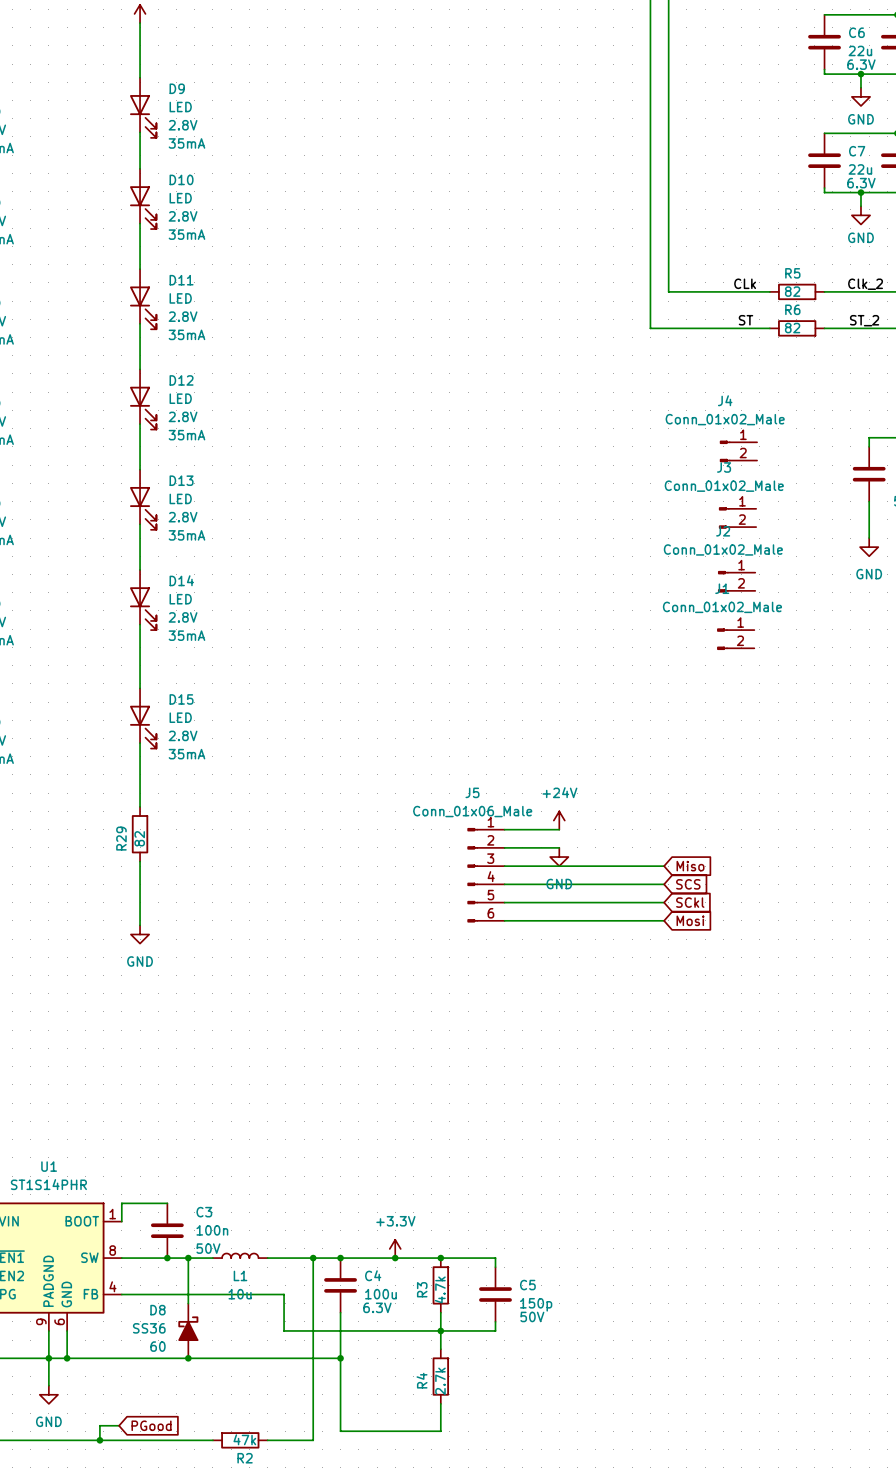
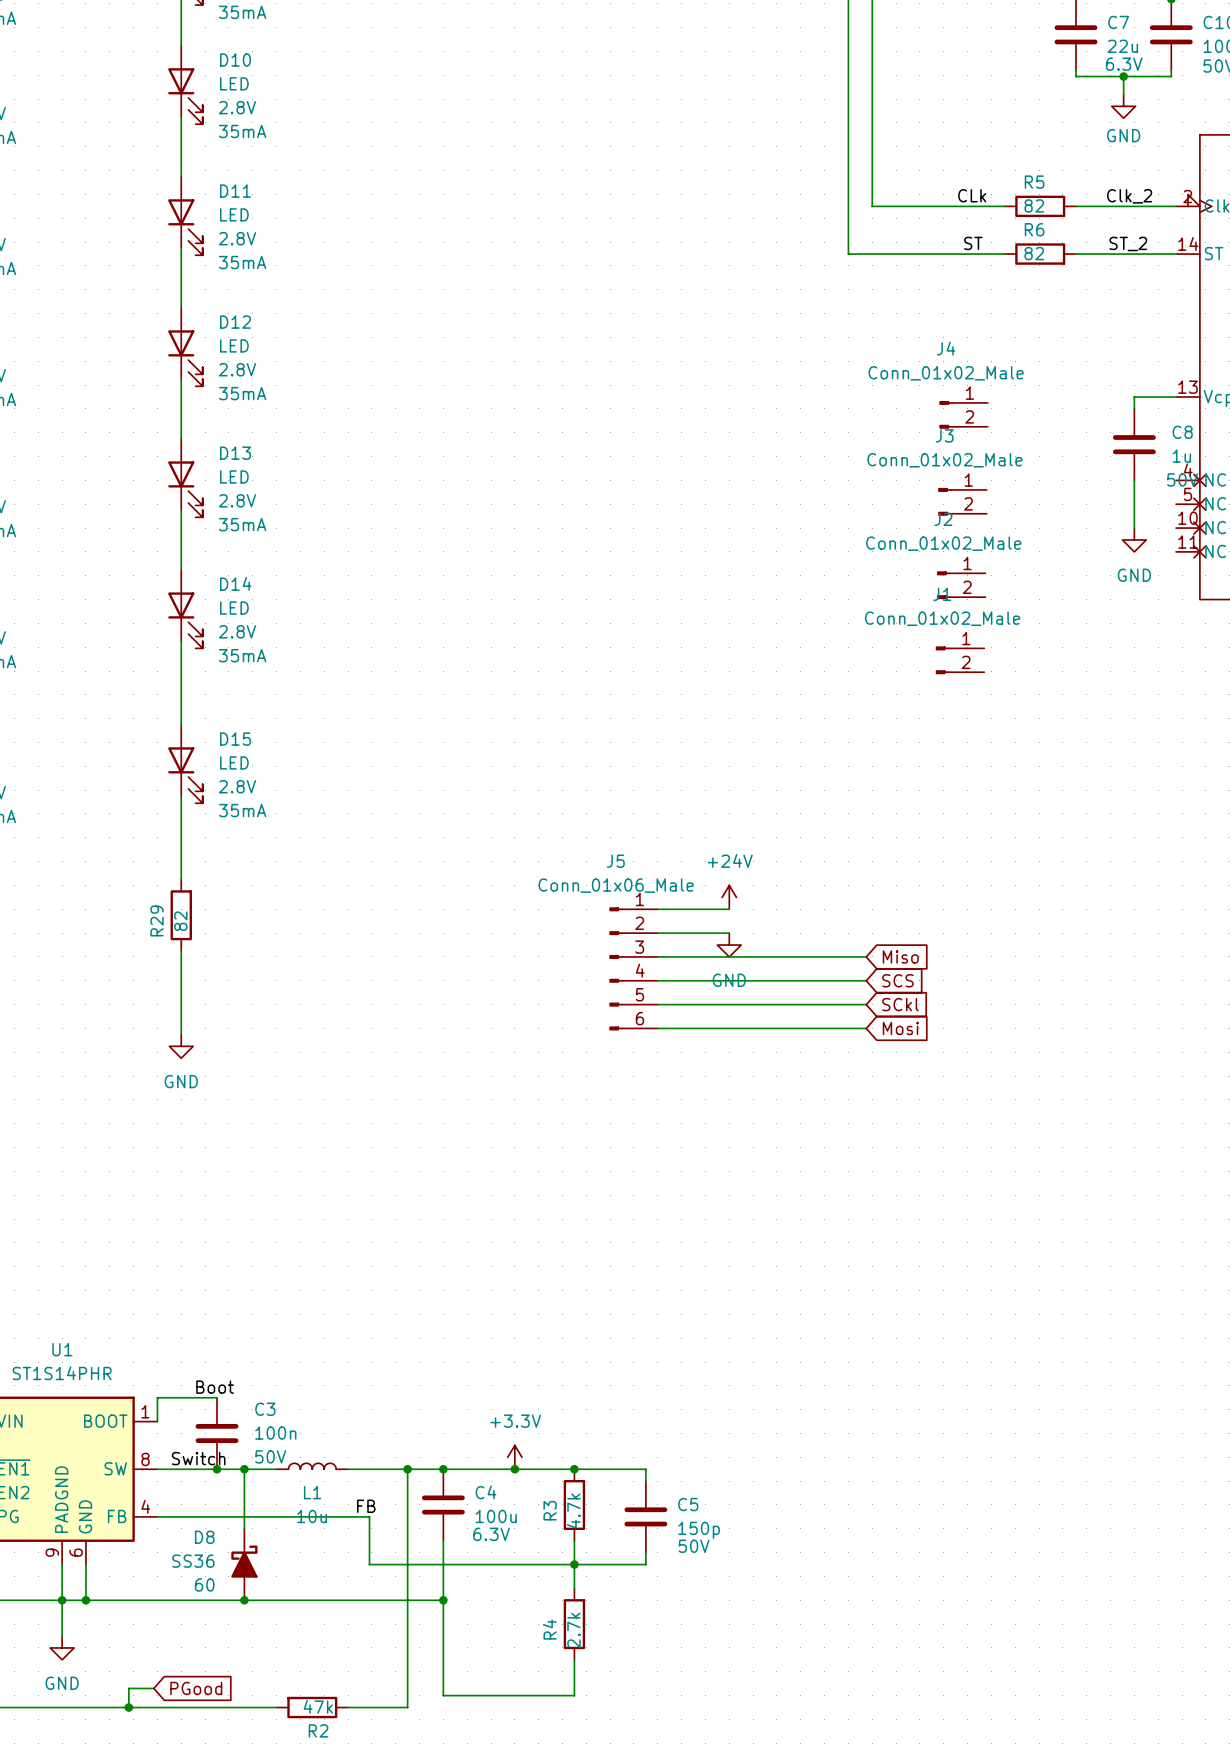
label: none -> Boot (215, 1387)
label: none -> Switch (198, 1458)
label: none -> FB (366, 1506)

